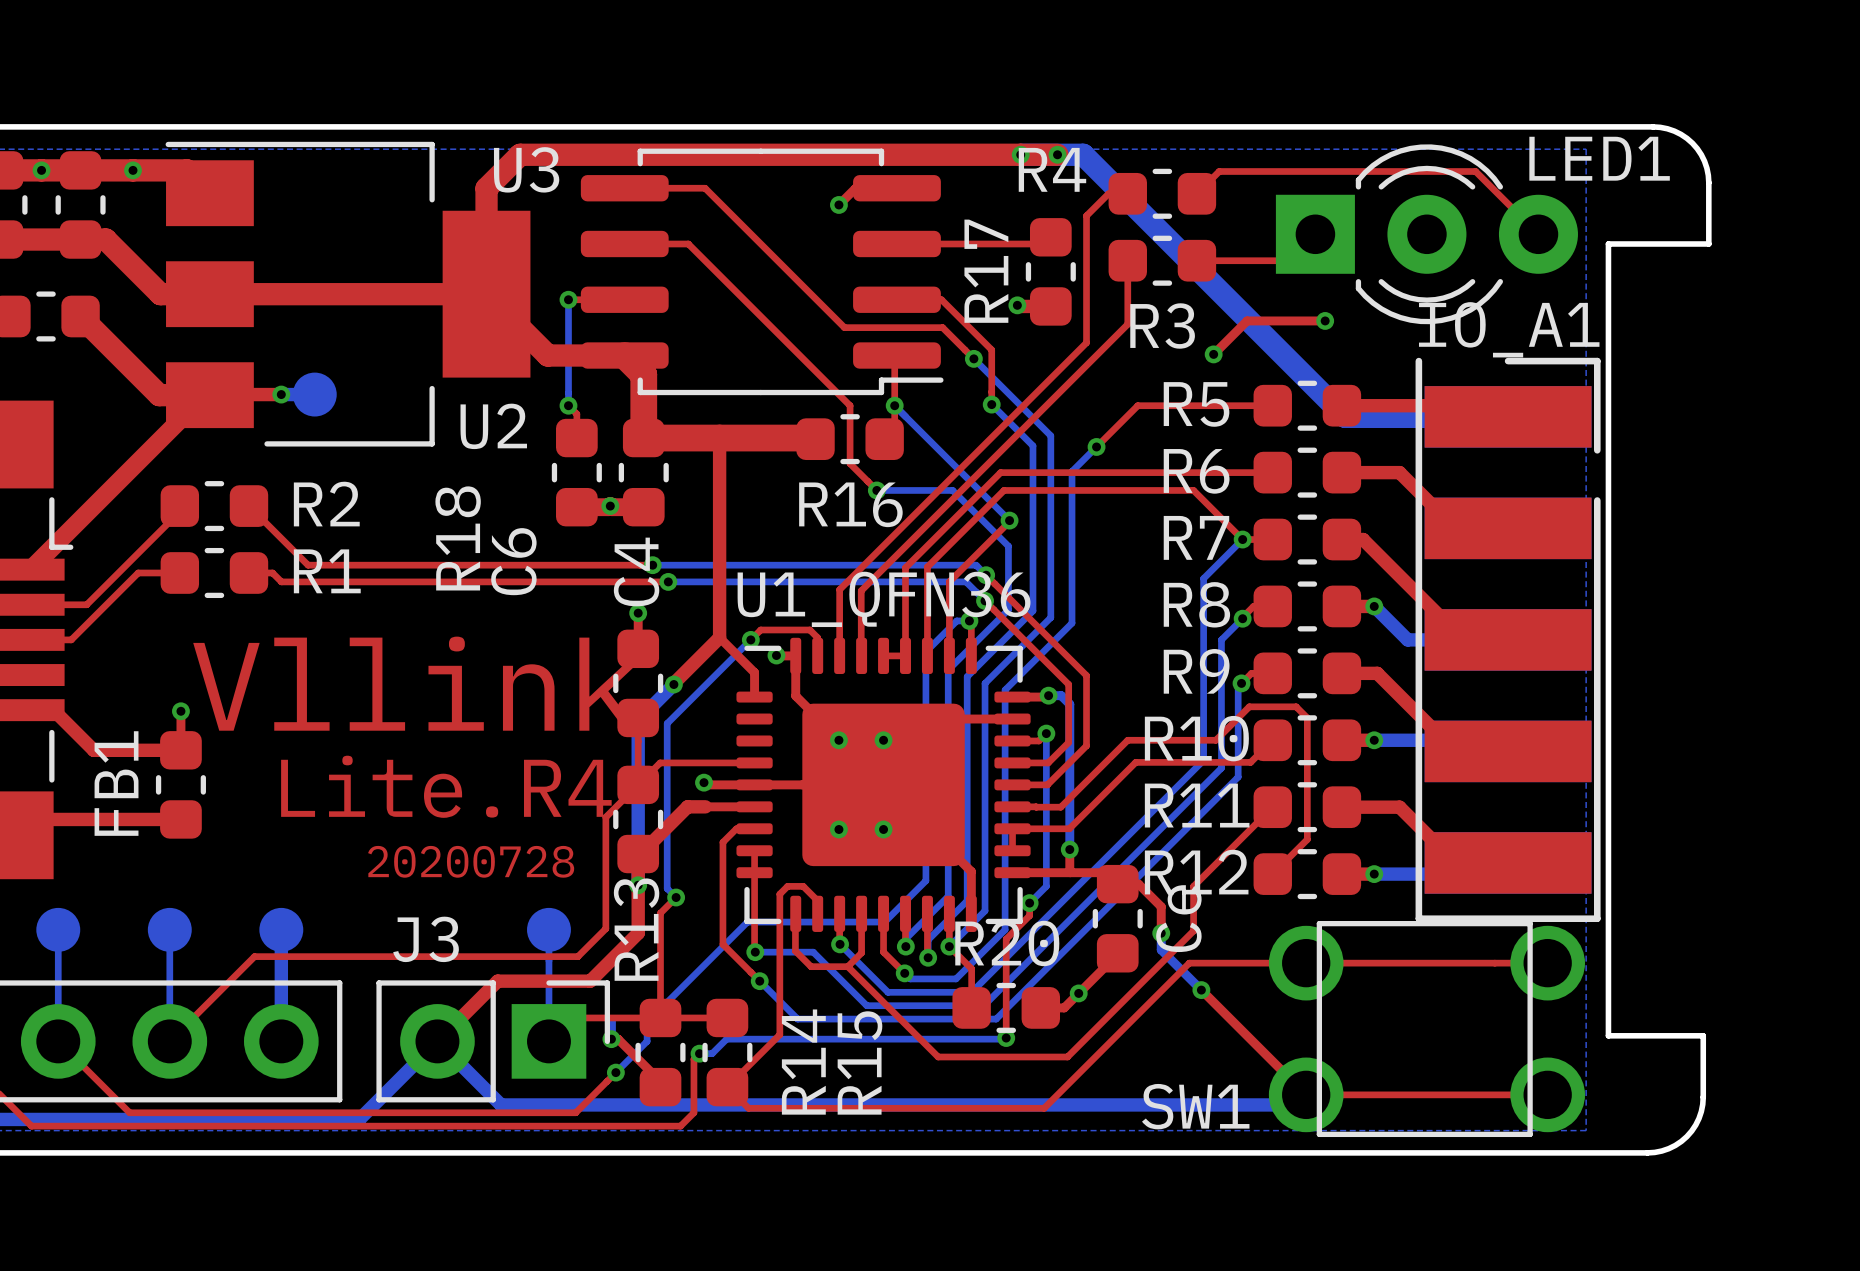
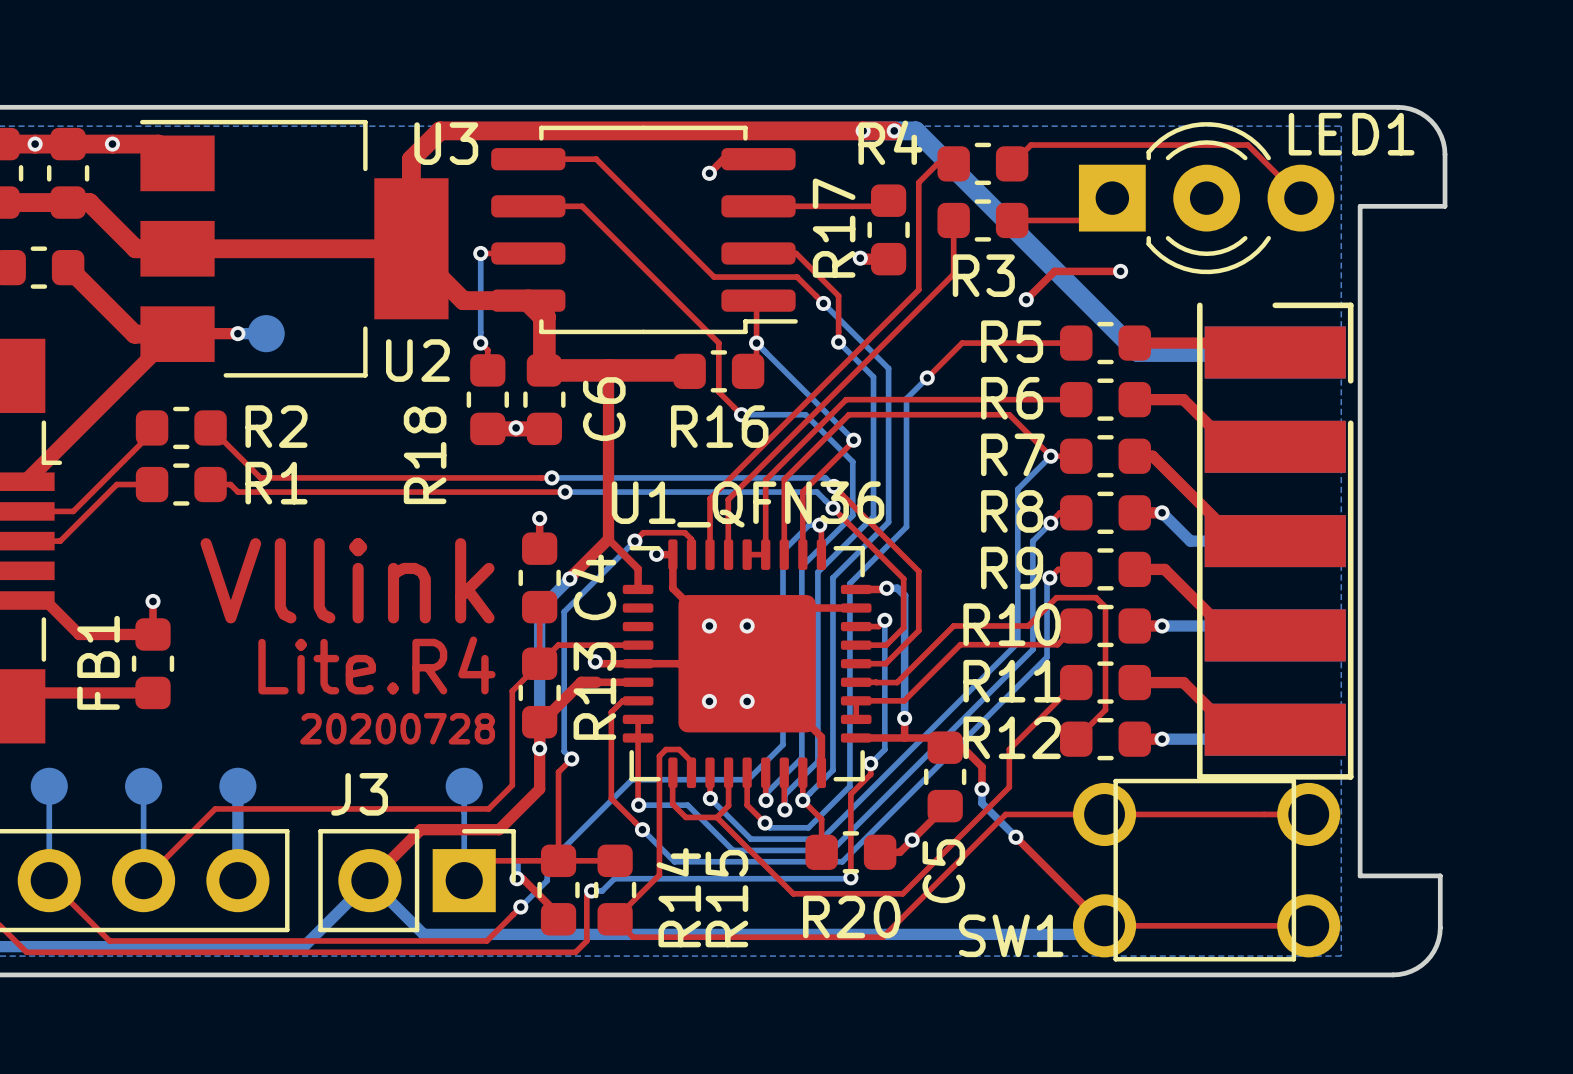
IO_A1 name: IO_A1 (1509, 329) -> none
R18 name position: R18 (458, 538) -> R18 (425, 455)
C6 name position: C6 (513, 561) -> C6 (604, 409)
C4 name position: C4 (636, 571) -> C4 (593, 587)
Ce name: Ce (1178, 918) -> C5 (943, 871)
R13 name position: R13 (636, 929) -> R13 (594, 691)
R20 name position: R20 (1007, 943) -> R20 (851, 916)

